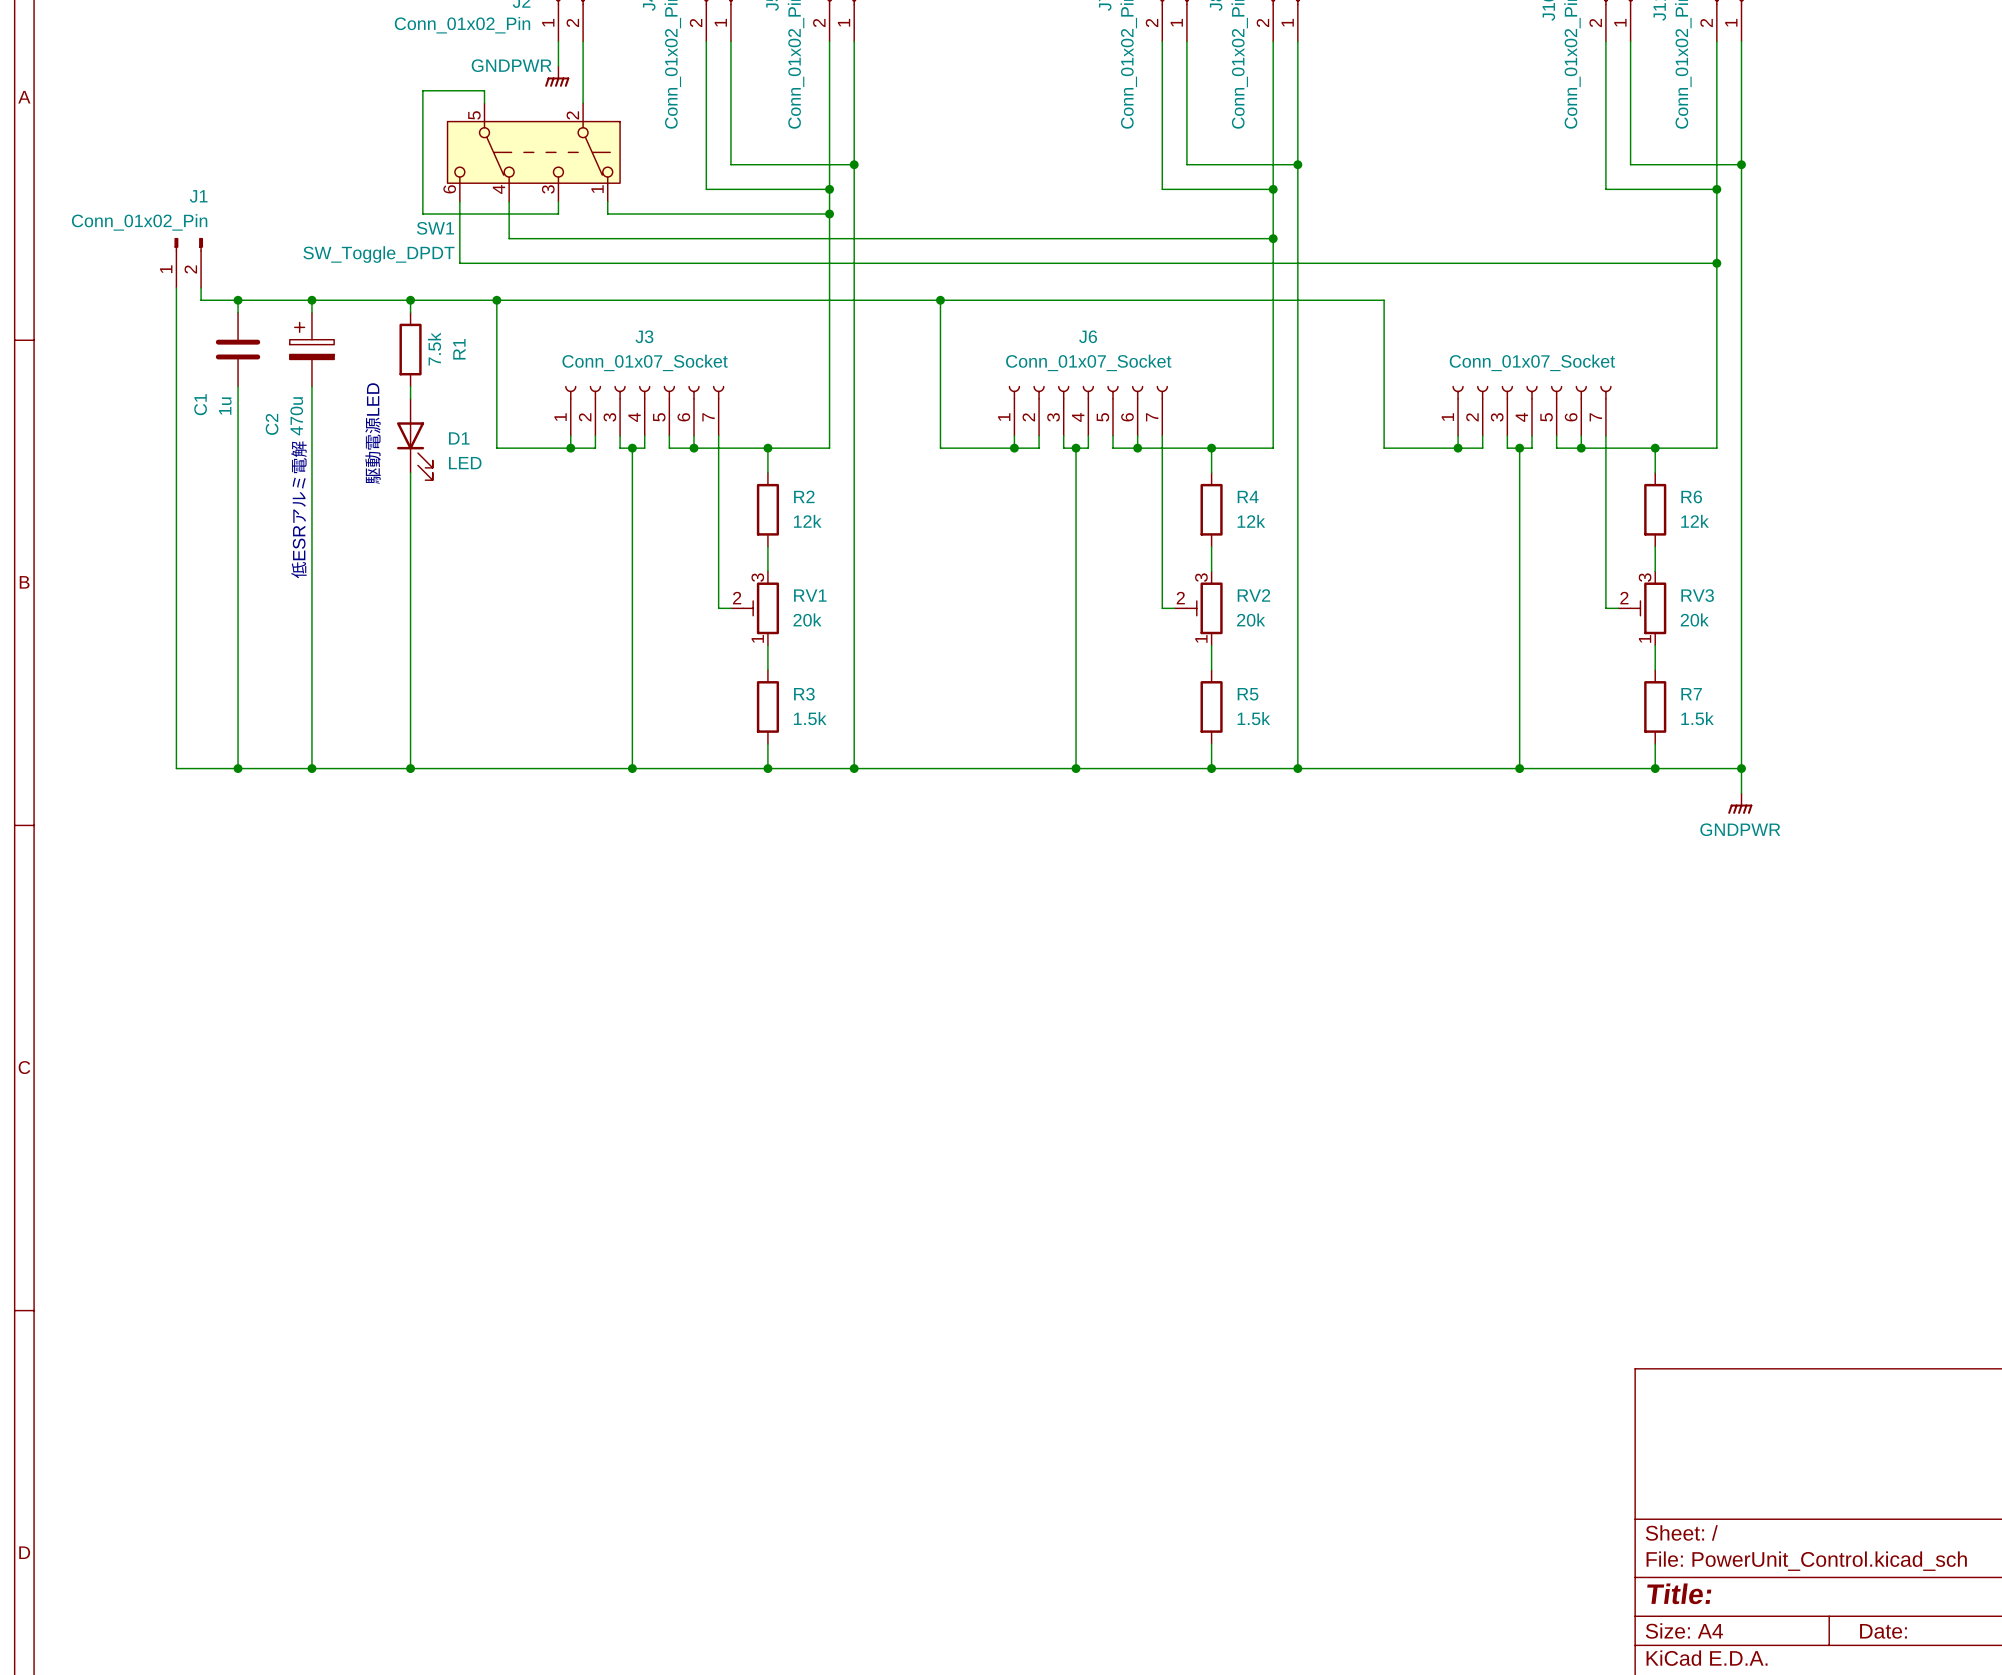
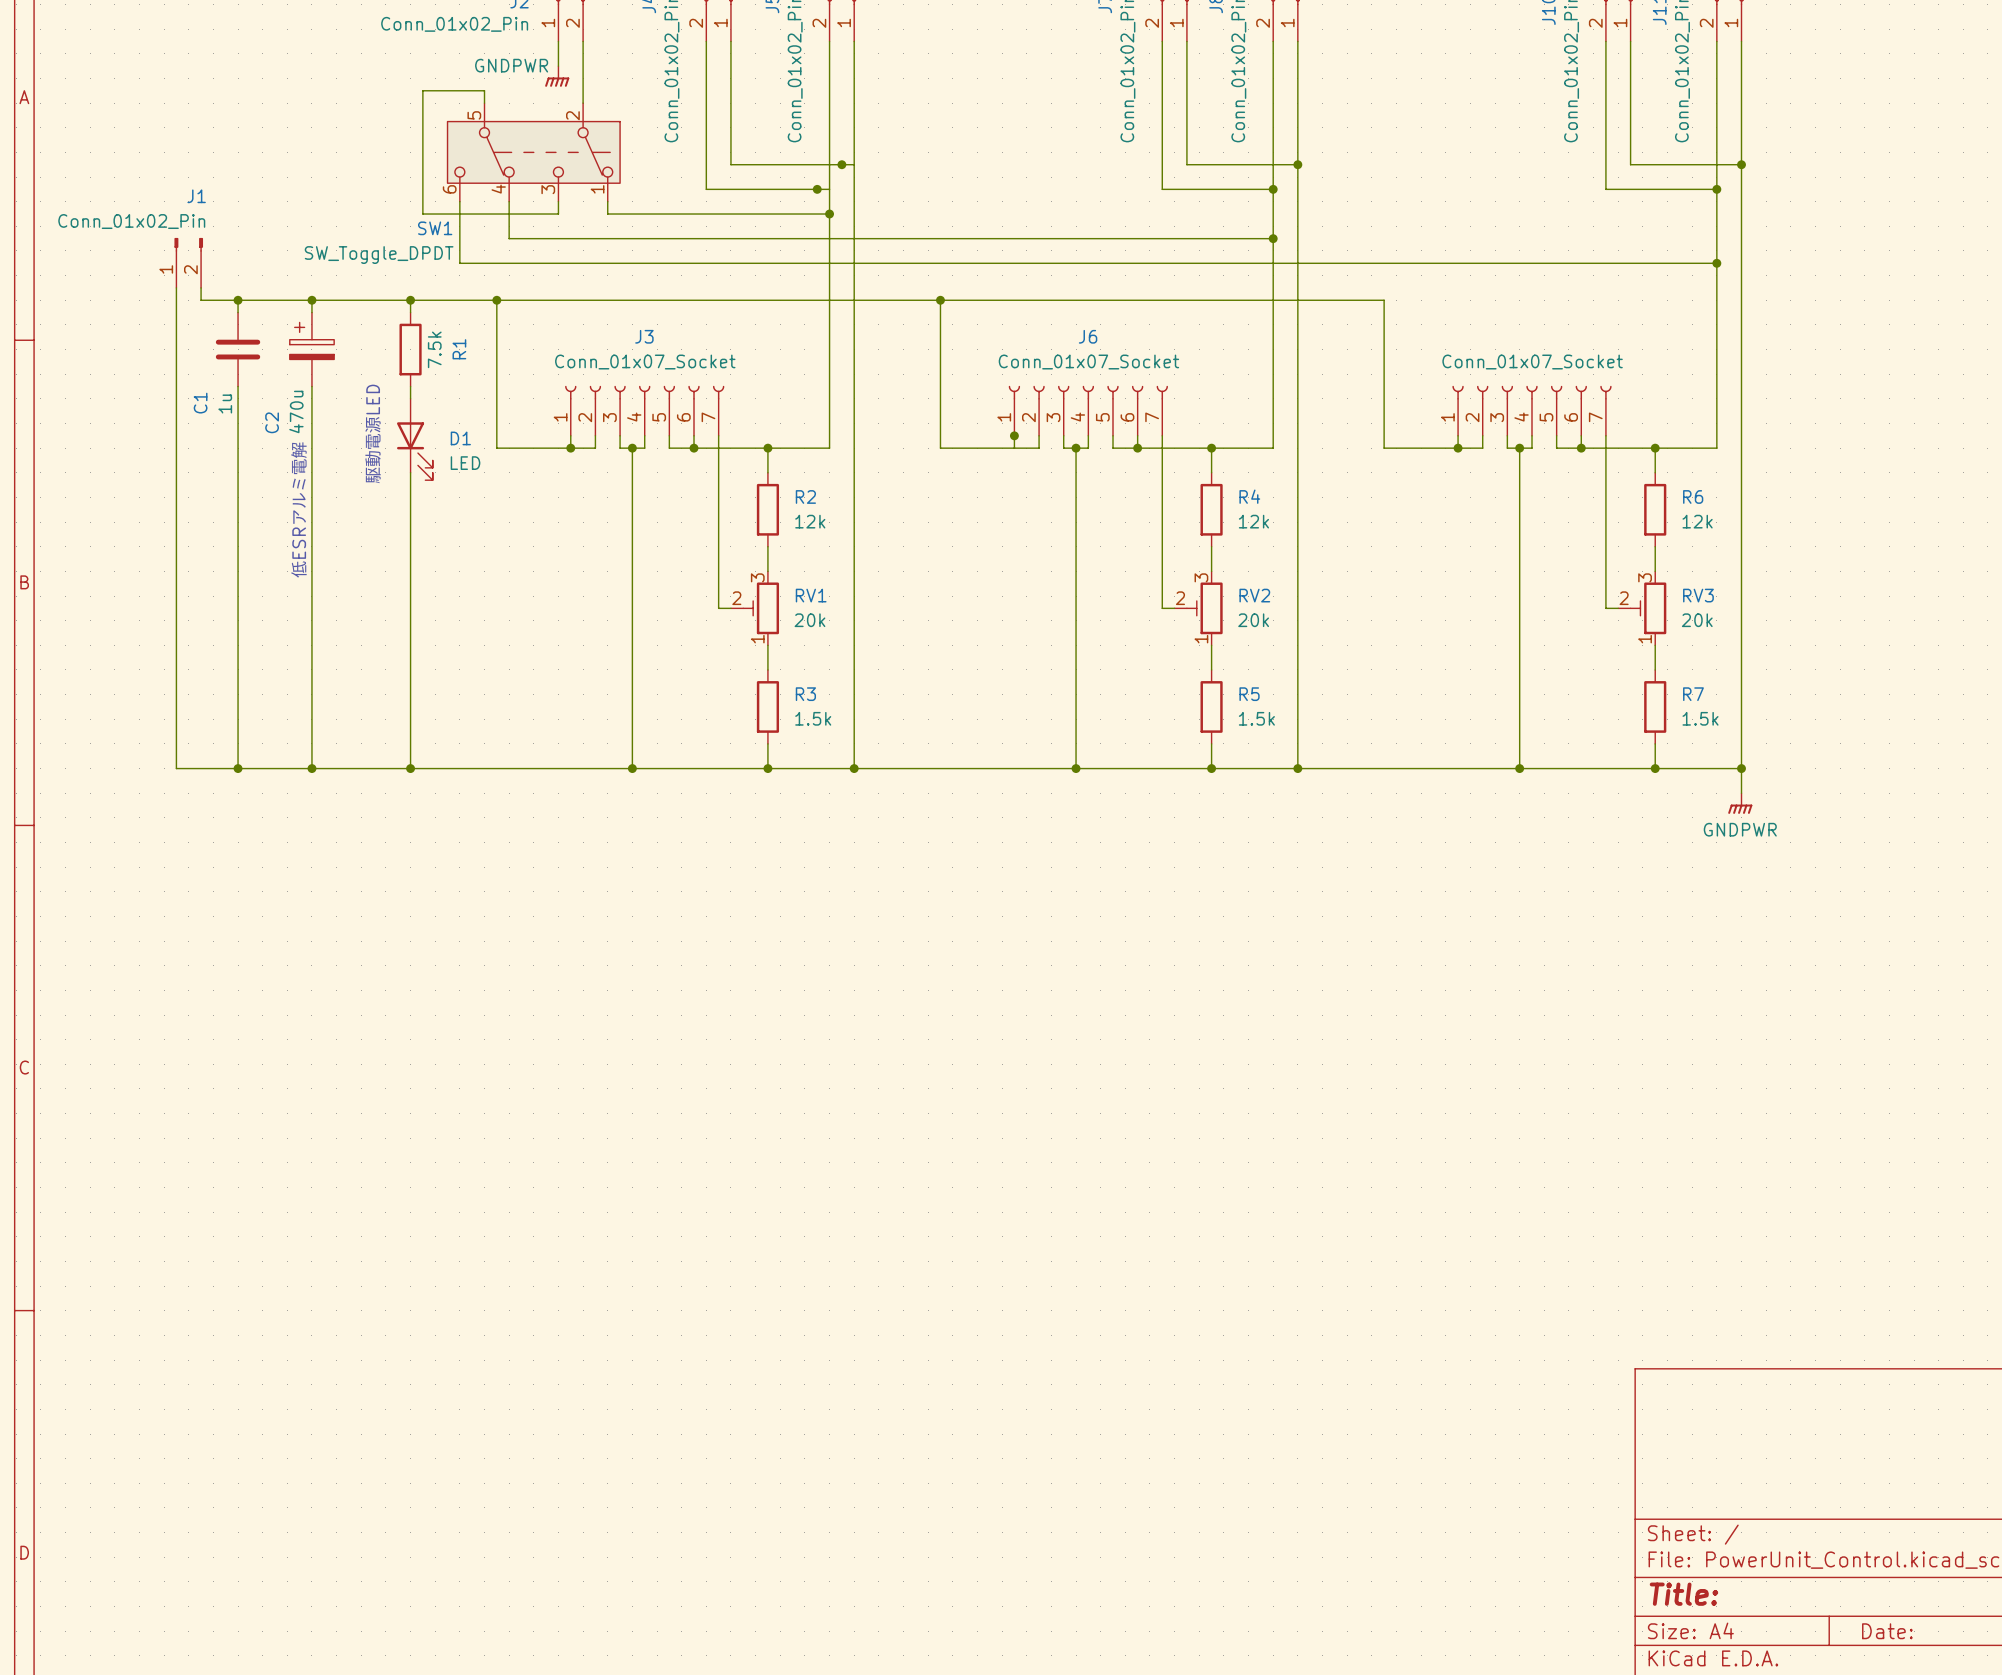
junction position: (854, 164) -> (841, 164)
junction position: (829, 189) -> (817, 189)
junction position: (1014, 448) -> (1014, 435)

